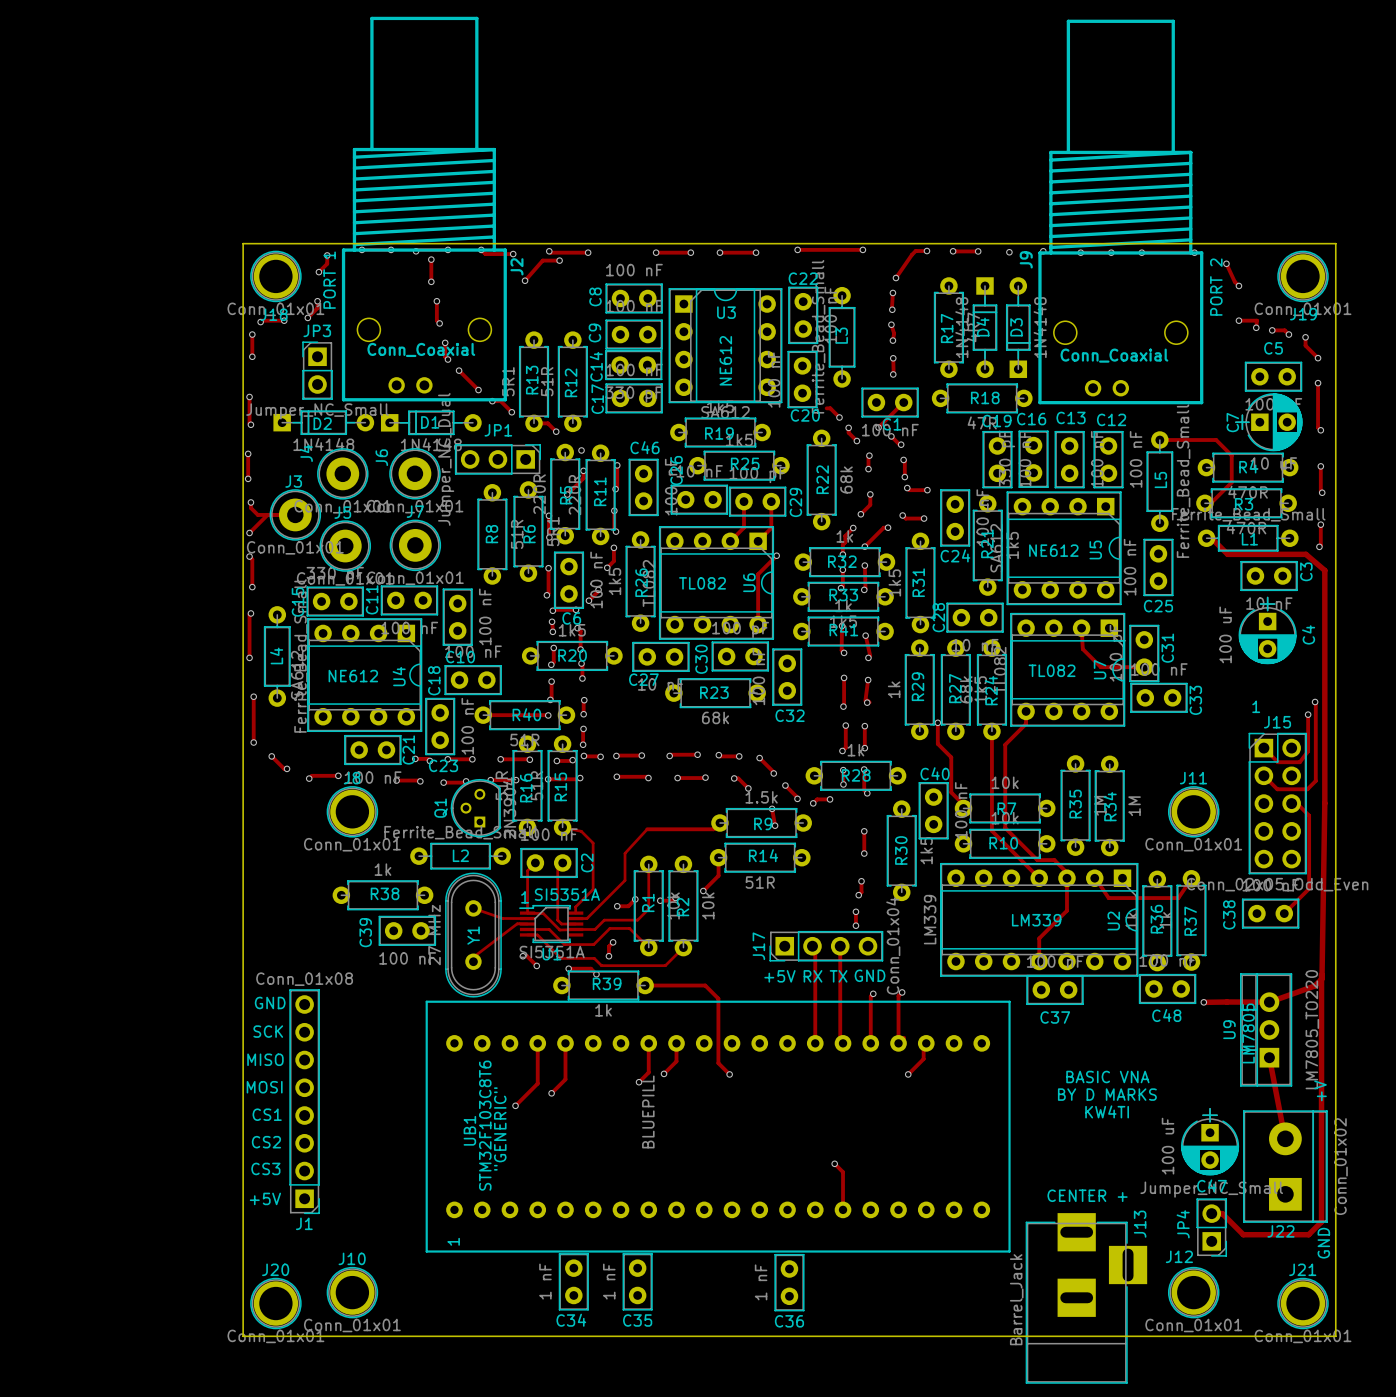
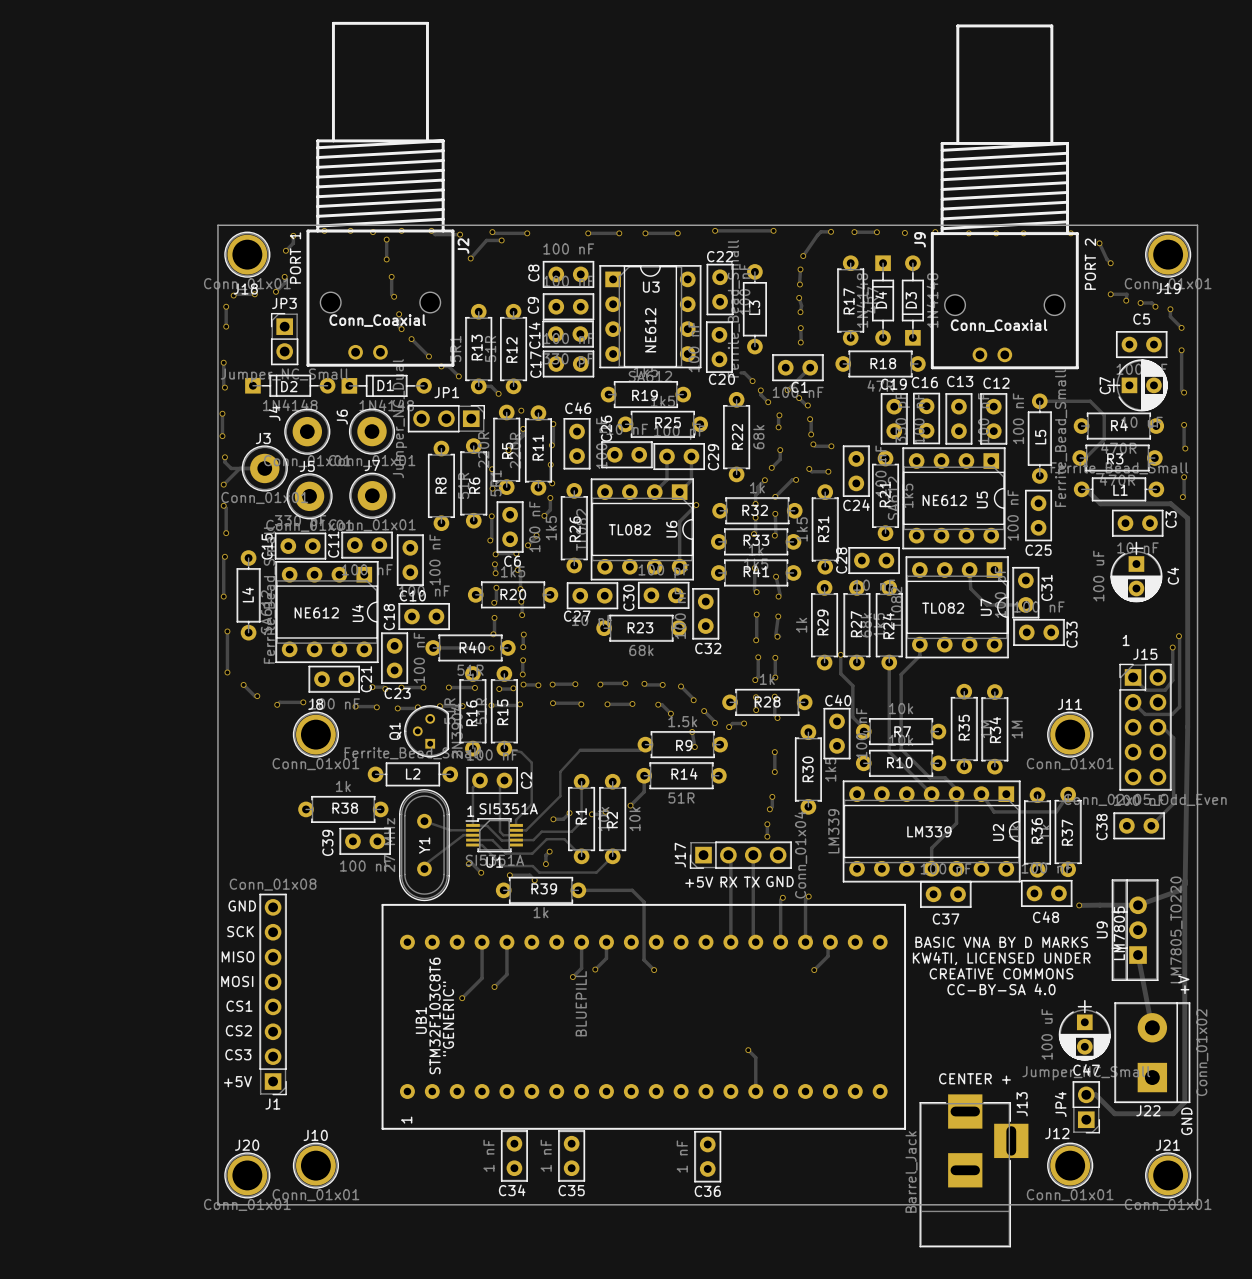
text: none -> BASIC VNA BY D MARKS (1001, 942)
text: none -> KW4TI, LICENSED UNDER (1001, 958)
text: BASIC VNA (1107, 1076) -> none
text: none -> CREATIVE COMMONS (1001, 973)
text: BY D MARKS (1107, 1094) -> none
text: none -> CC-BY-SA 4.0 (1001, 989)
text: KW4TI (1107, 1111) -> none

